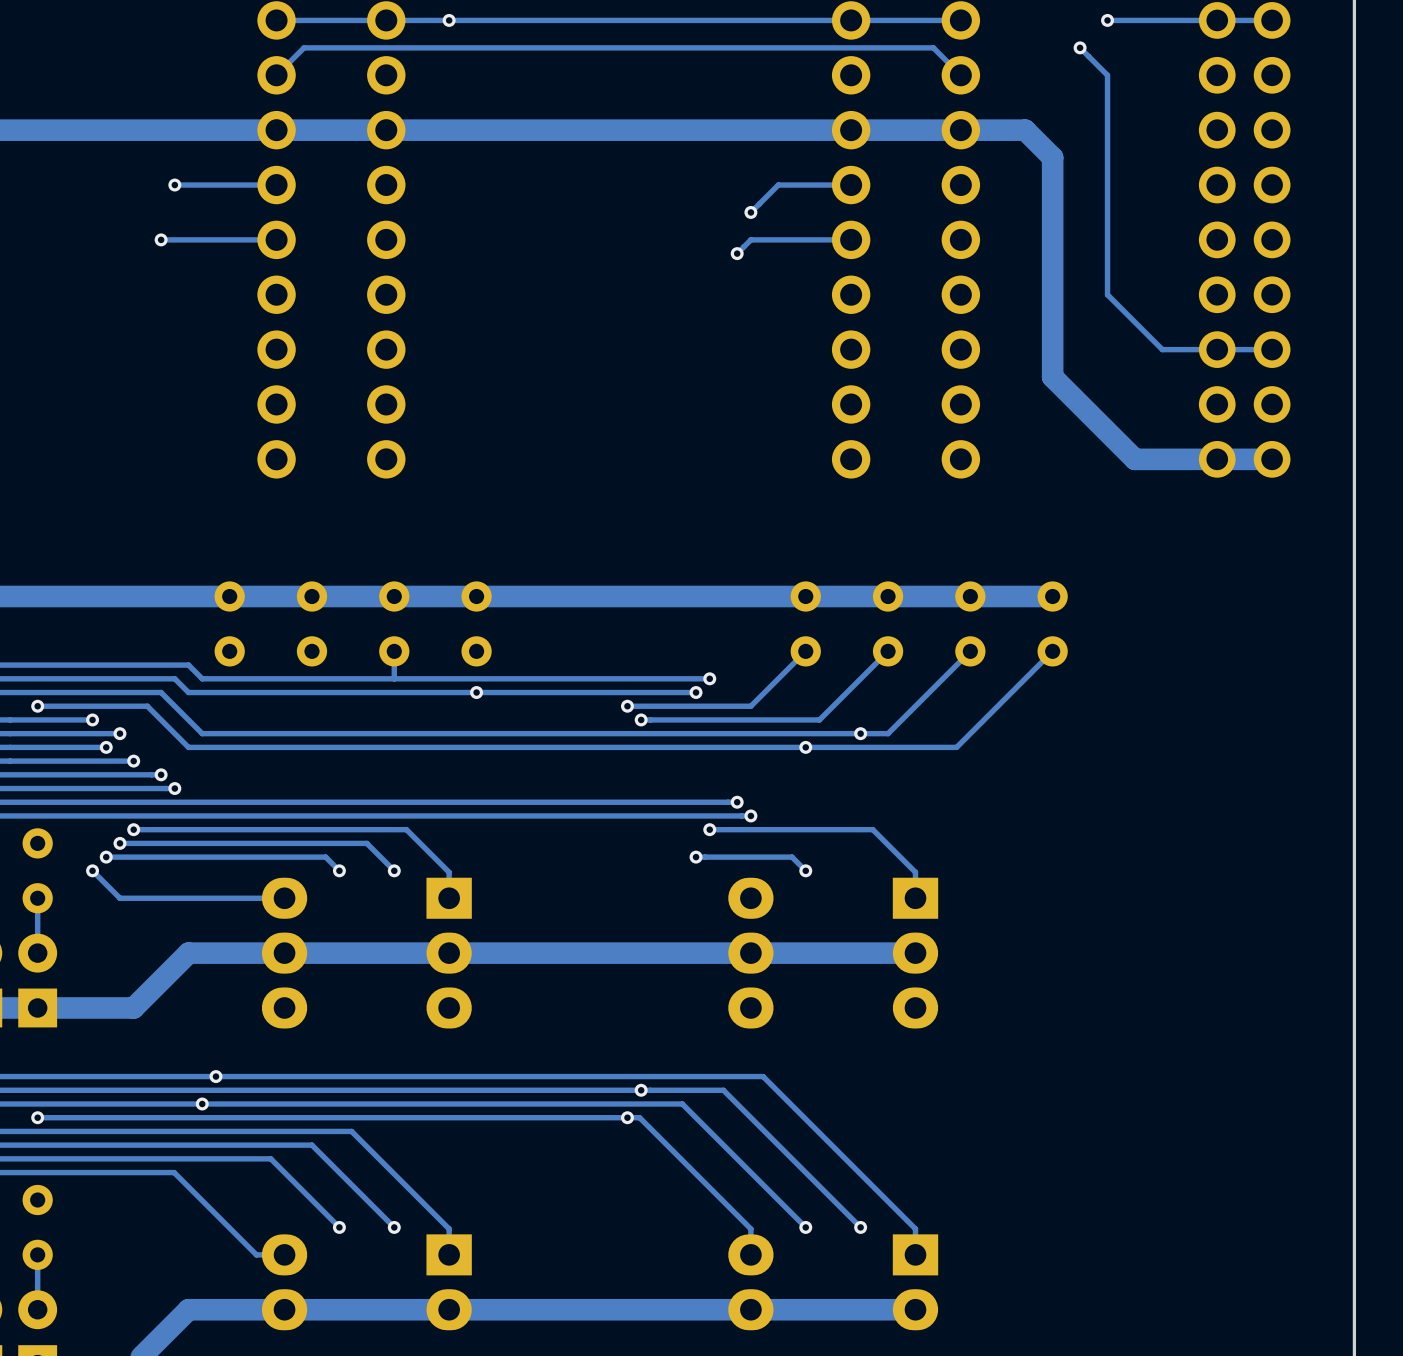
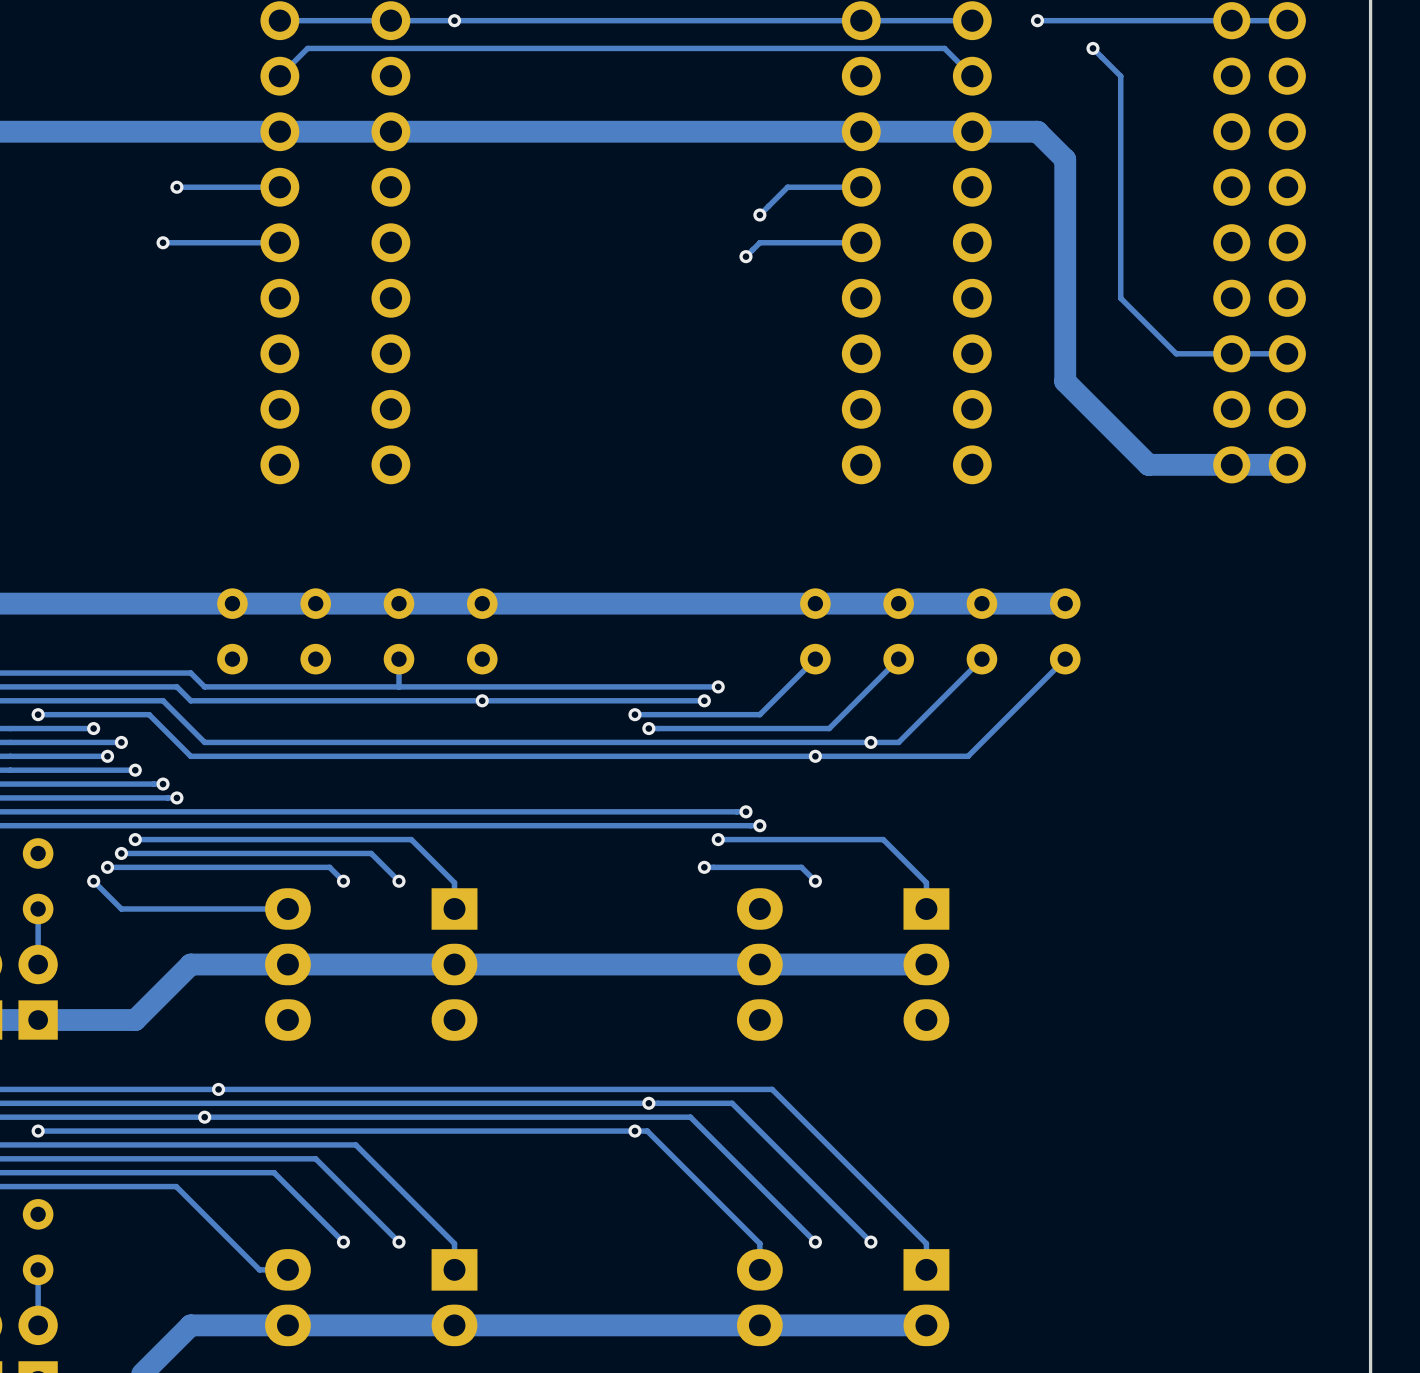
track: none -> (1120, 20) (1037, 20)
via position: (1107, 20) -> (1037, 20)

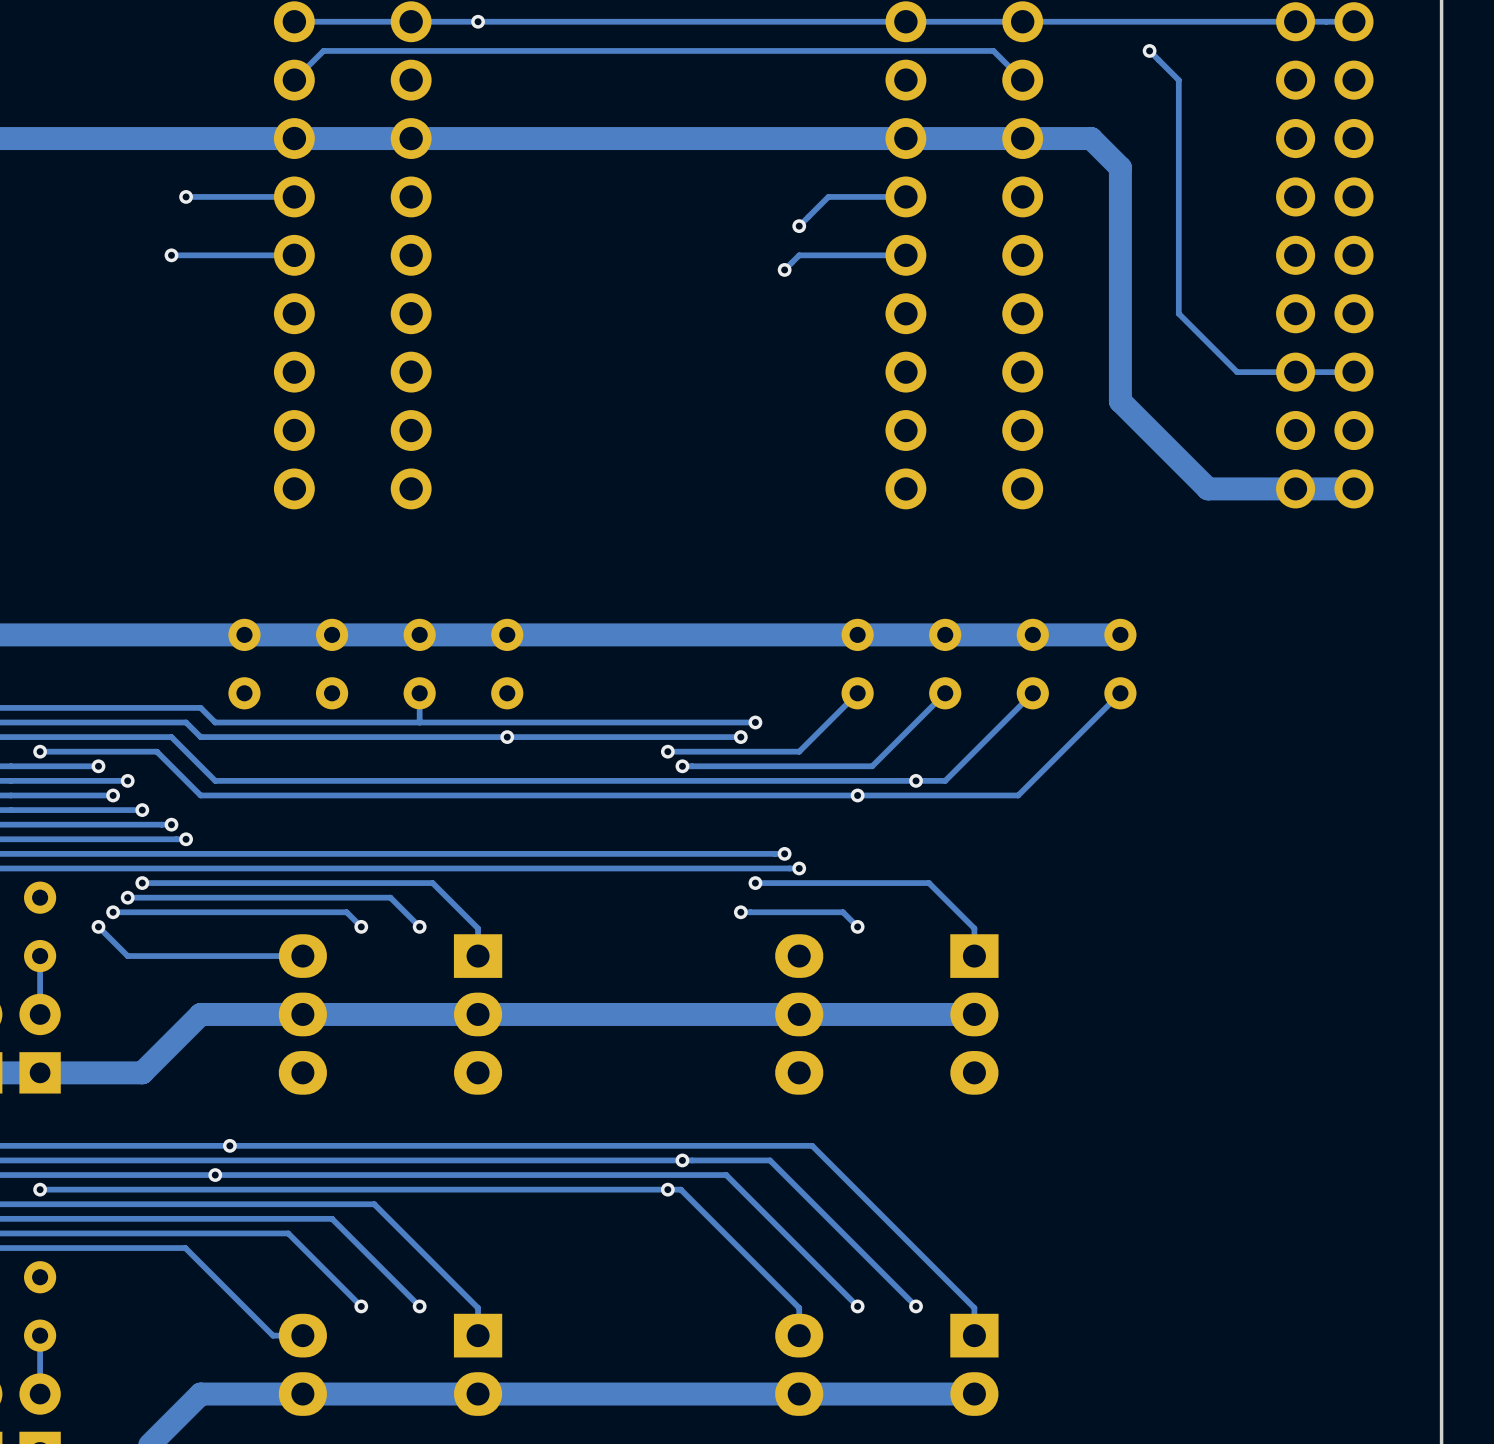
track: none -> (1091, 21) (1022, 21)
via: (1037, 20) -> none

